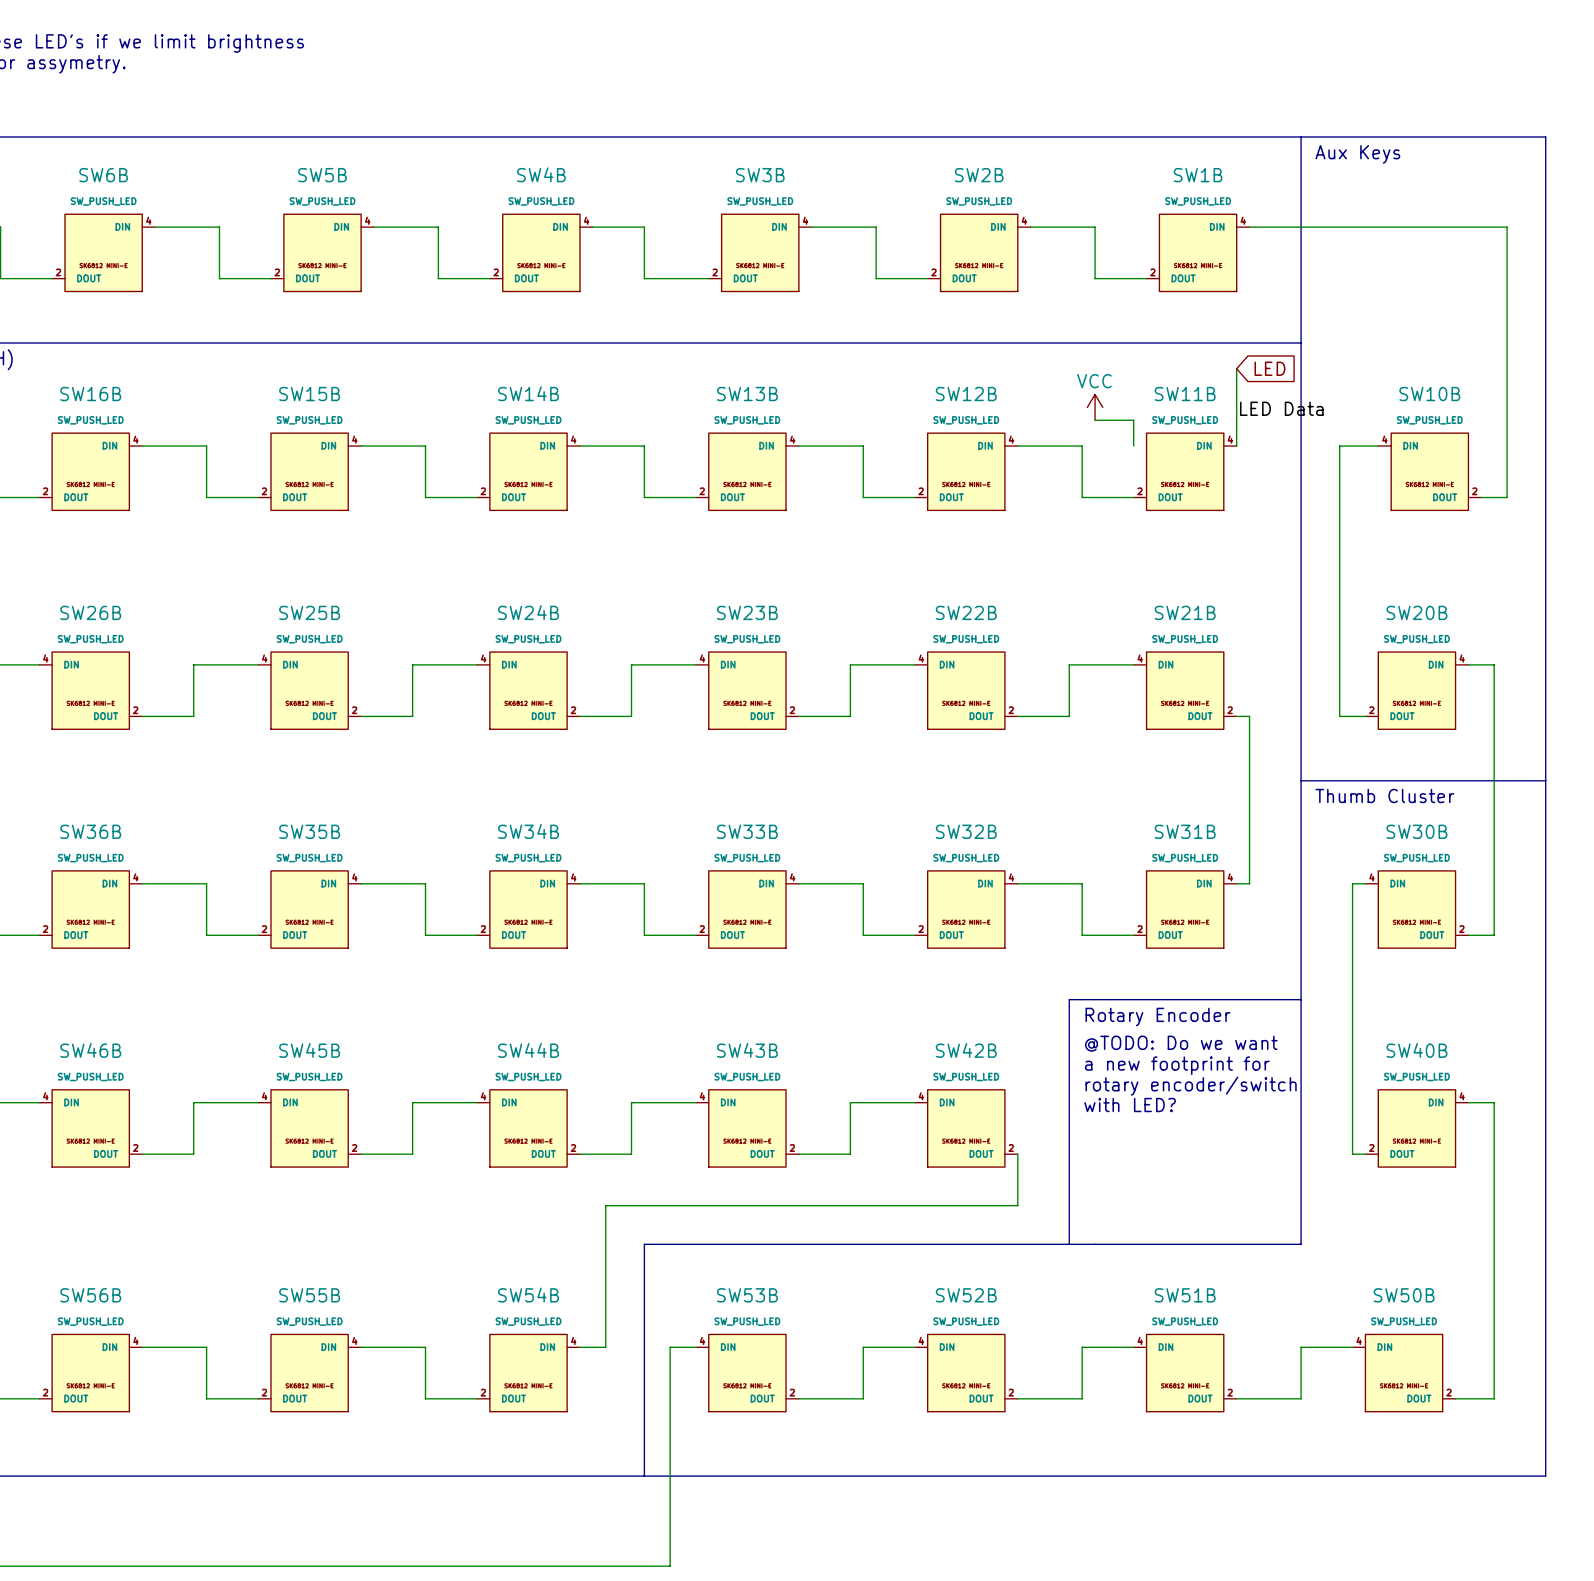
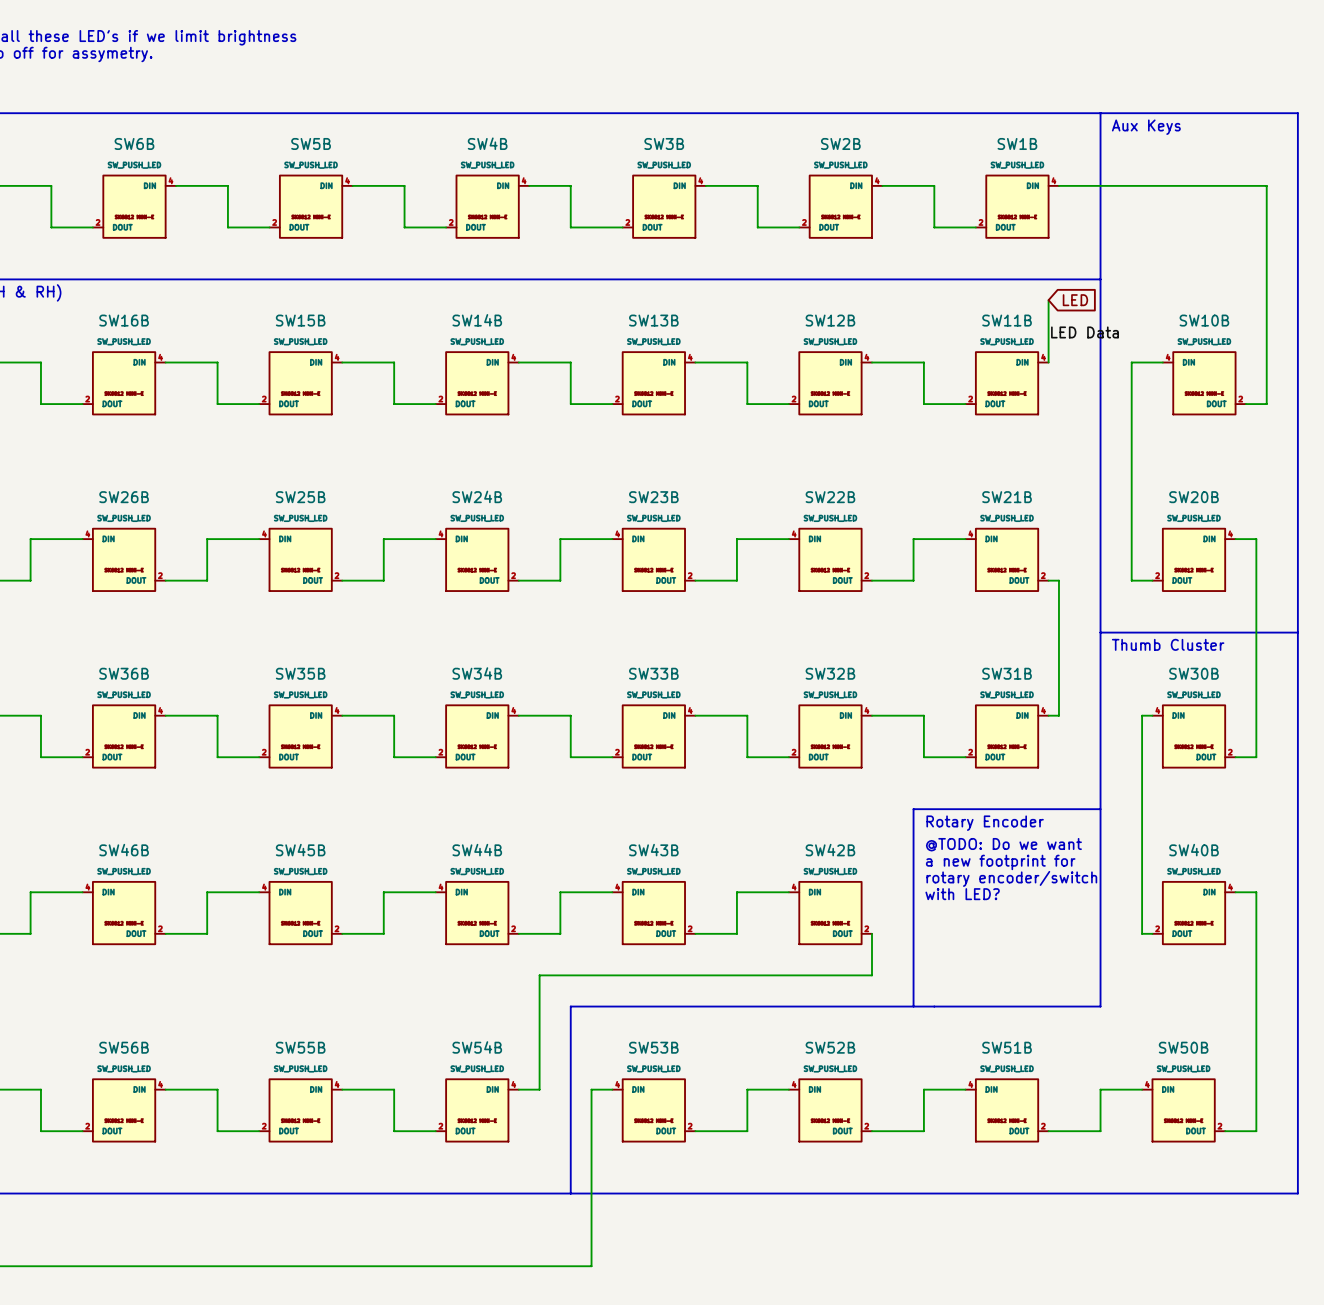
power symbol: VCC (1095, 407) -> none
wire: (1095, 420) (1133, 420) (1133, 446) -> none

